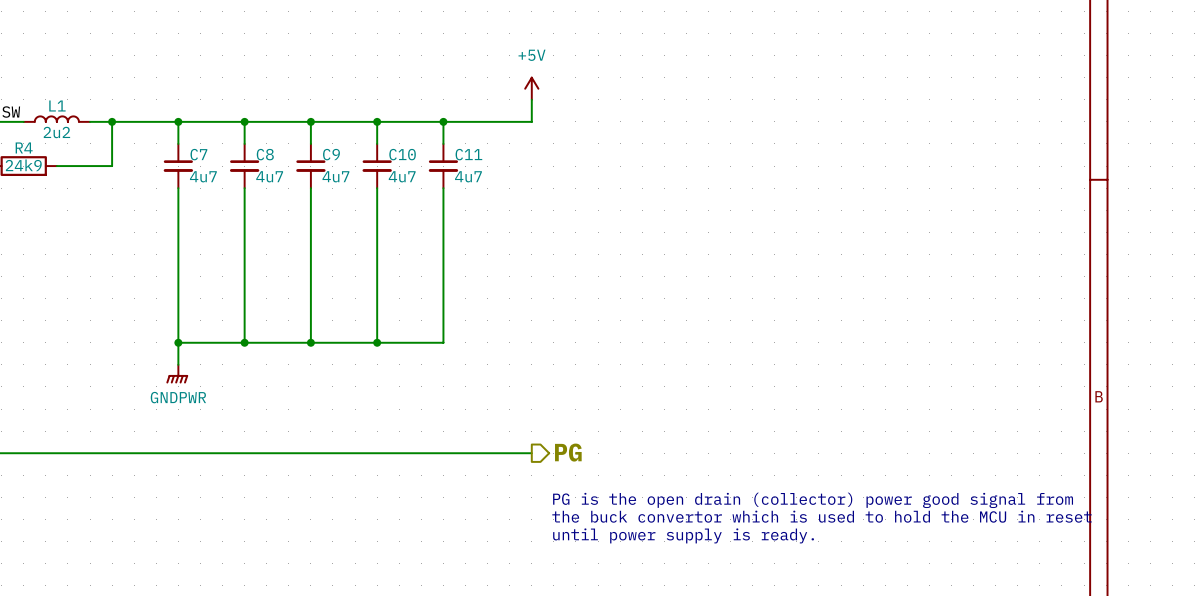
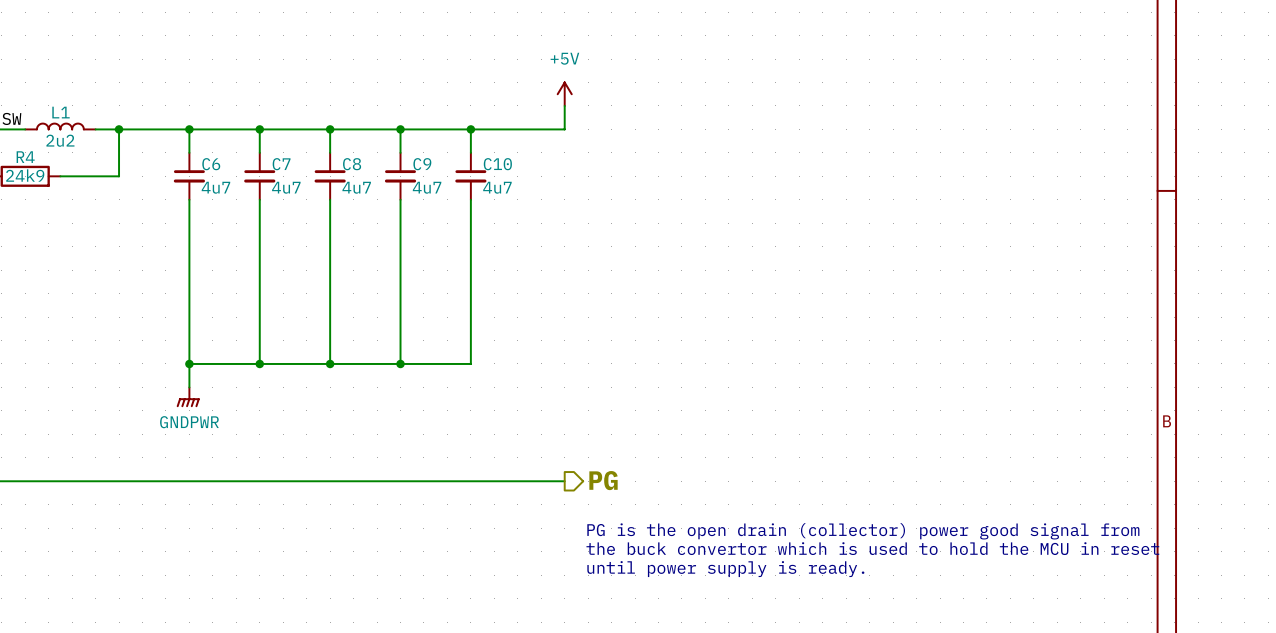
C7 name: C7 (198, 154) -> C6 (211, 164)
C8 name: C8 (265, 154) -> C7 (281, 164)
C9 name: C9 (331, 154) -> C8 (352, 164)
C10 name: C10 (402, 154) -> C9 (422, 164)
C11 name: C11 (468, 154) -> C10 (497, 164)

